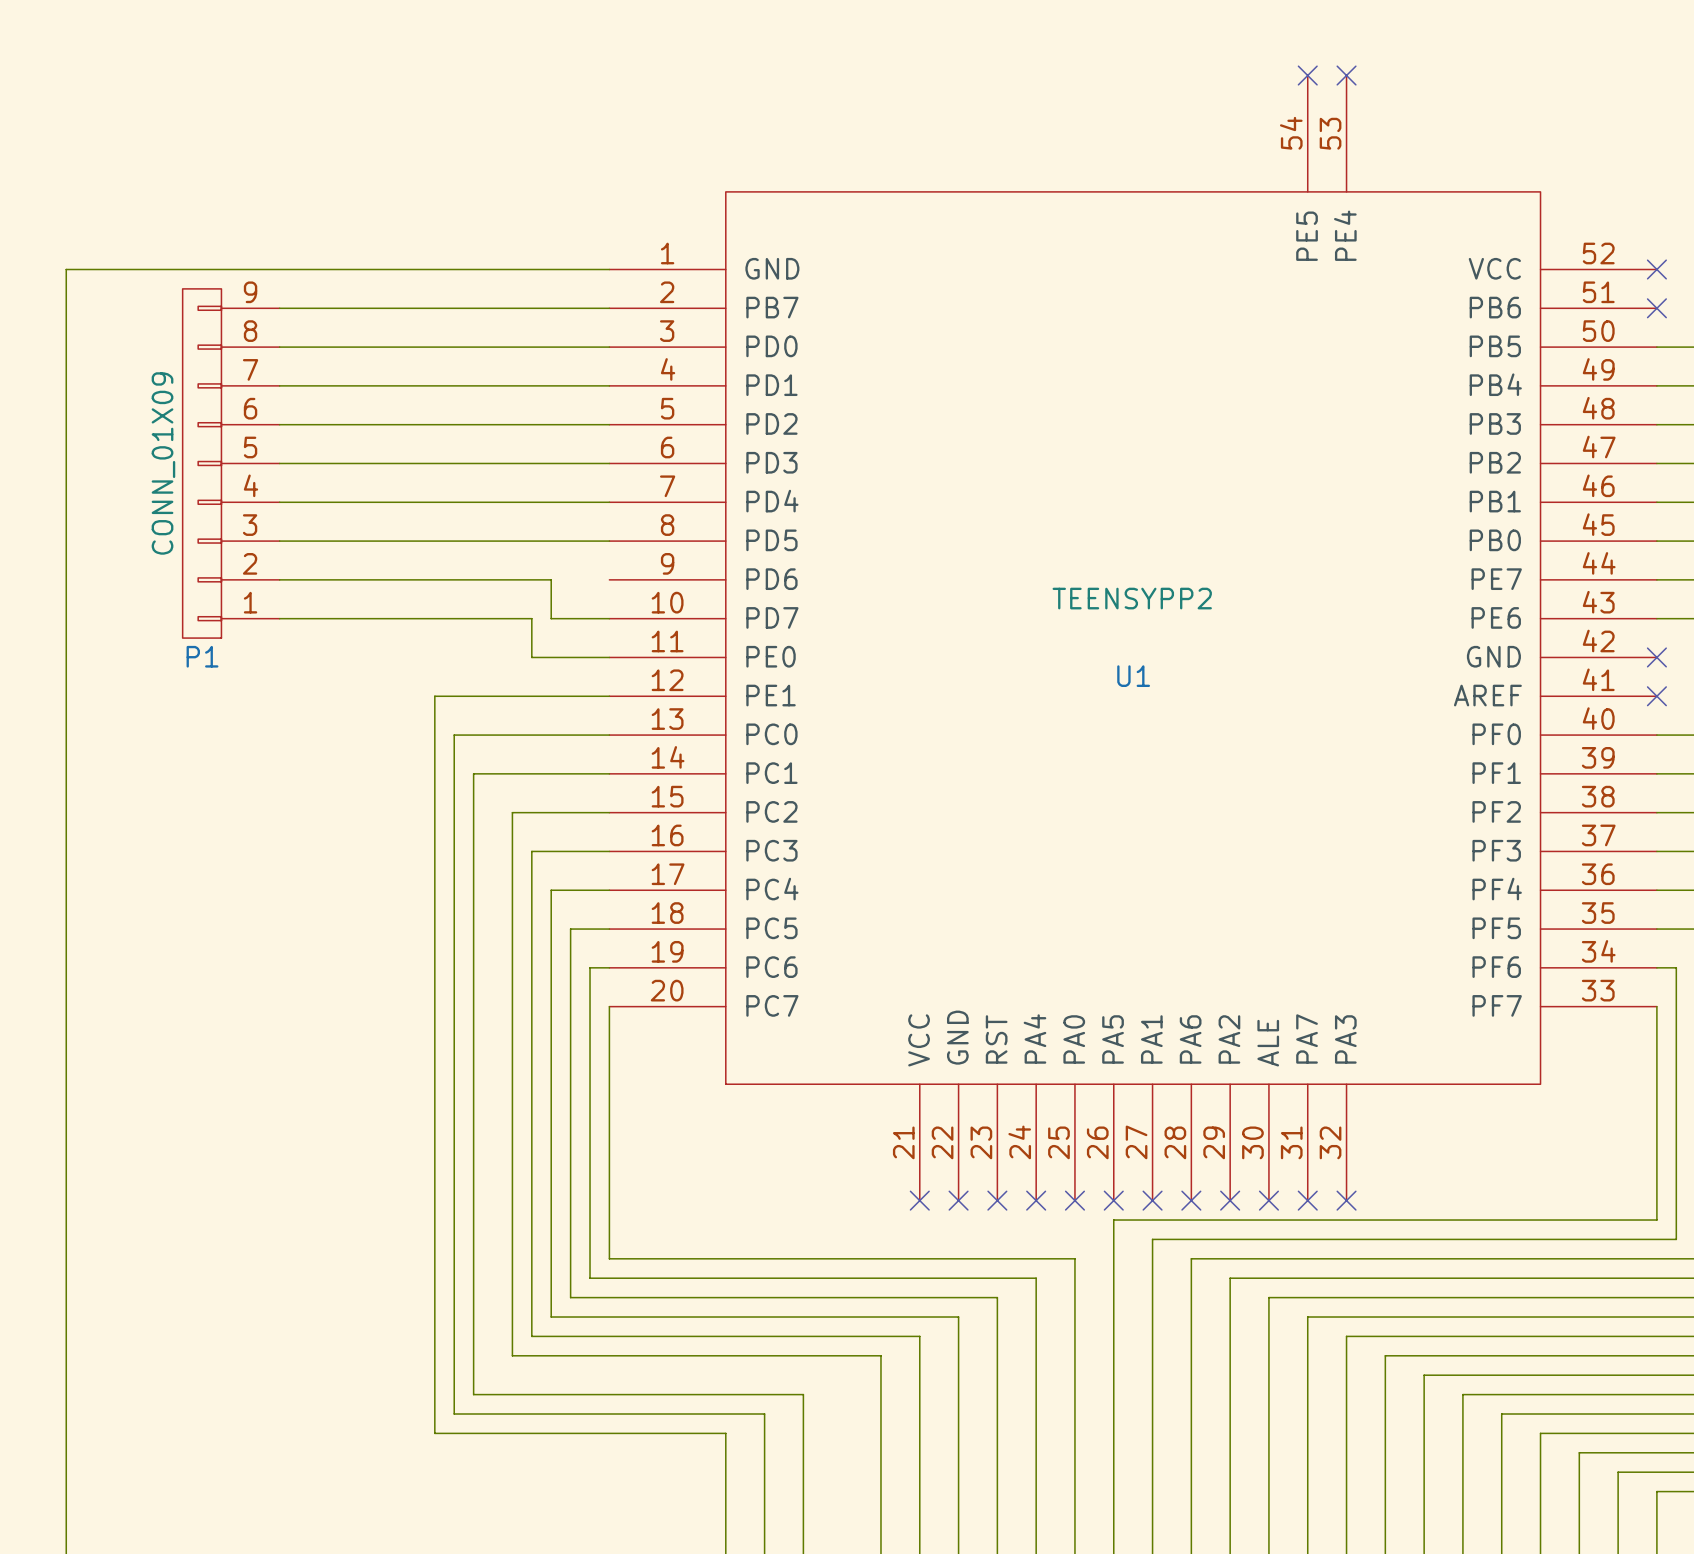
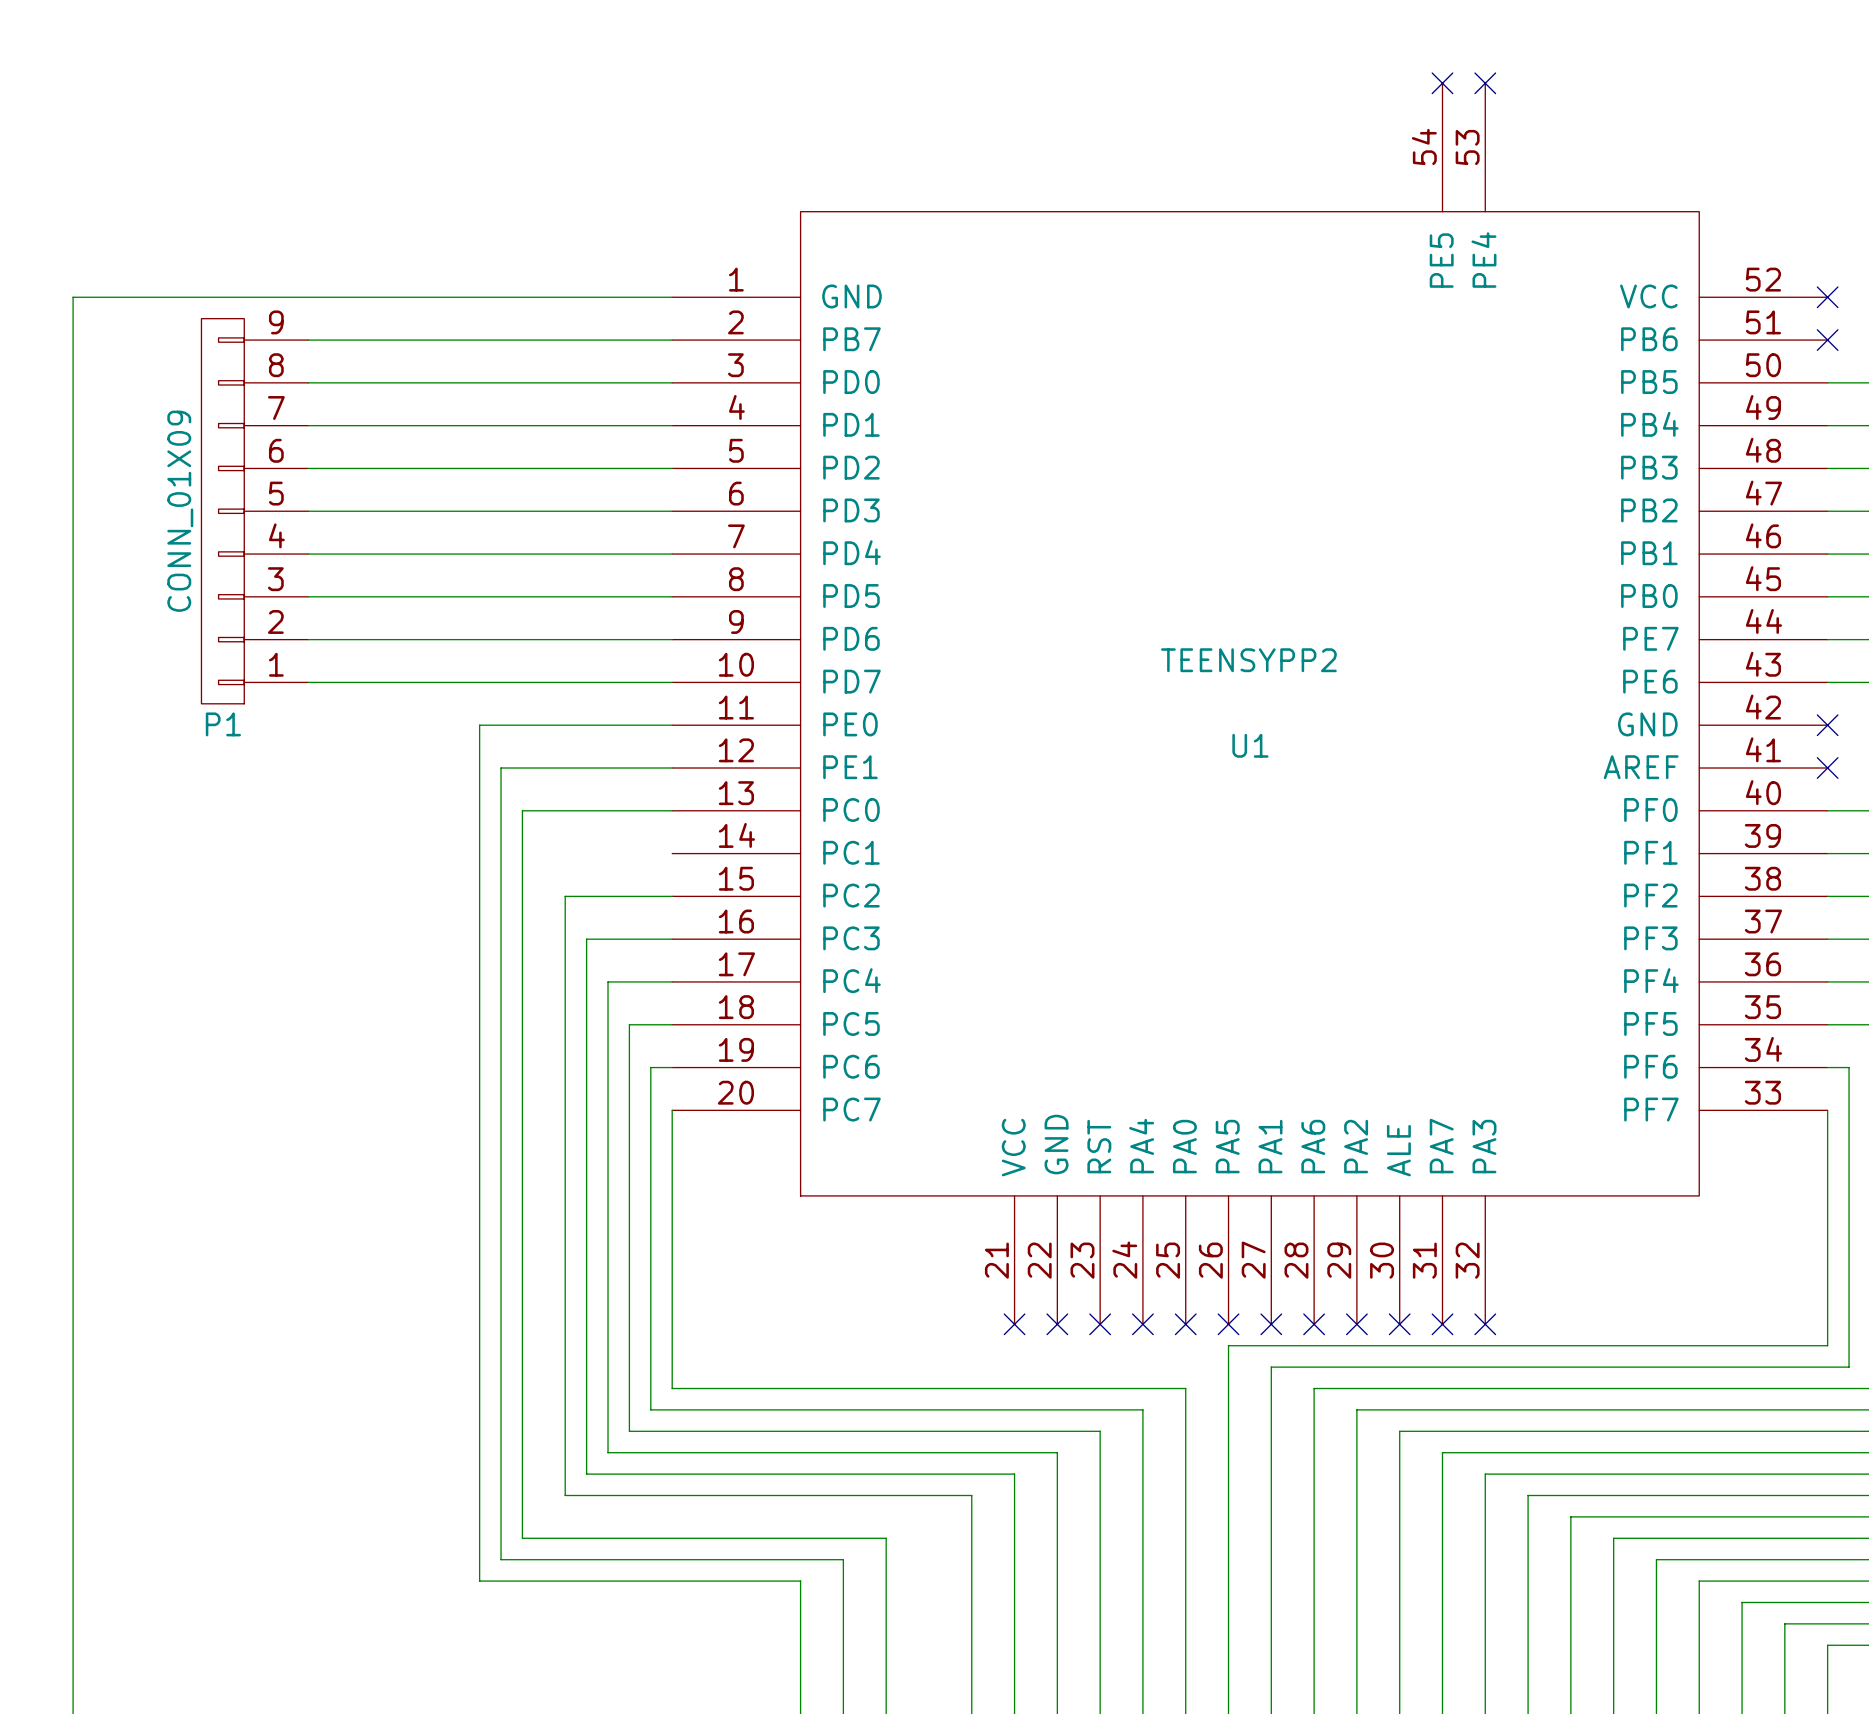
wire: (551, 579) (551, 618) -> (586, 682) (608, 682)
wire: none -> (608, 639) (672, 639)
wire: (531, 618) (531, 657) -> (479, 768) (479, 725) (586, 725)
wire: (434, 696) (454, 696) -> (501, 810) (501, 768)
wire: (454, 735) (473, 735) -> (522, 853) (522, 810)
wire: (473, 773) (609, 773) -> none

